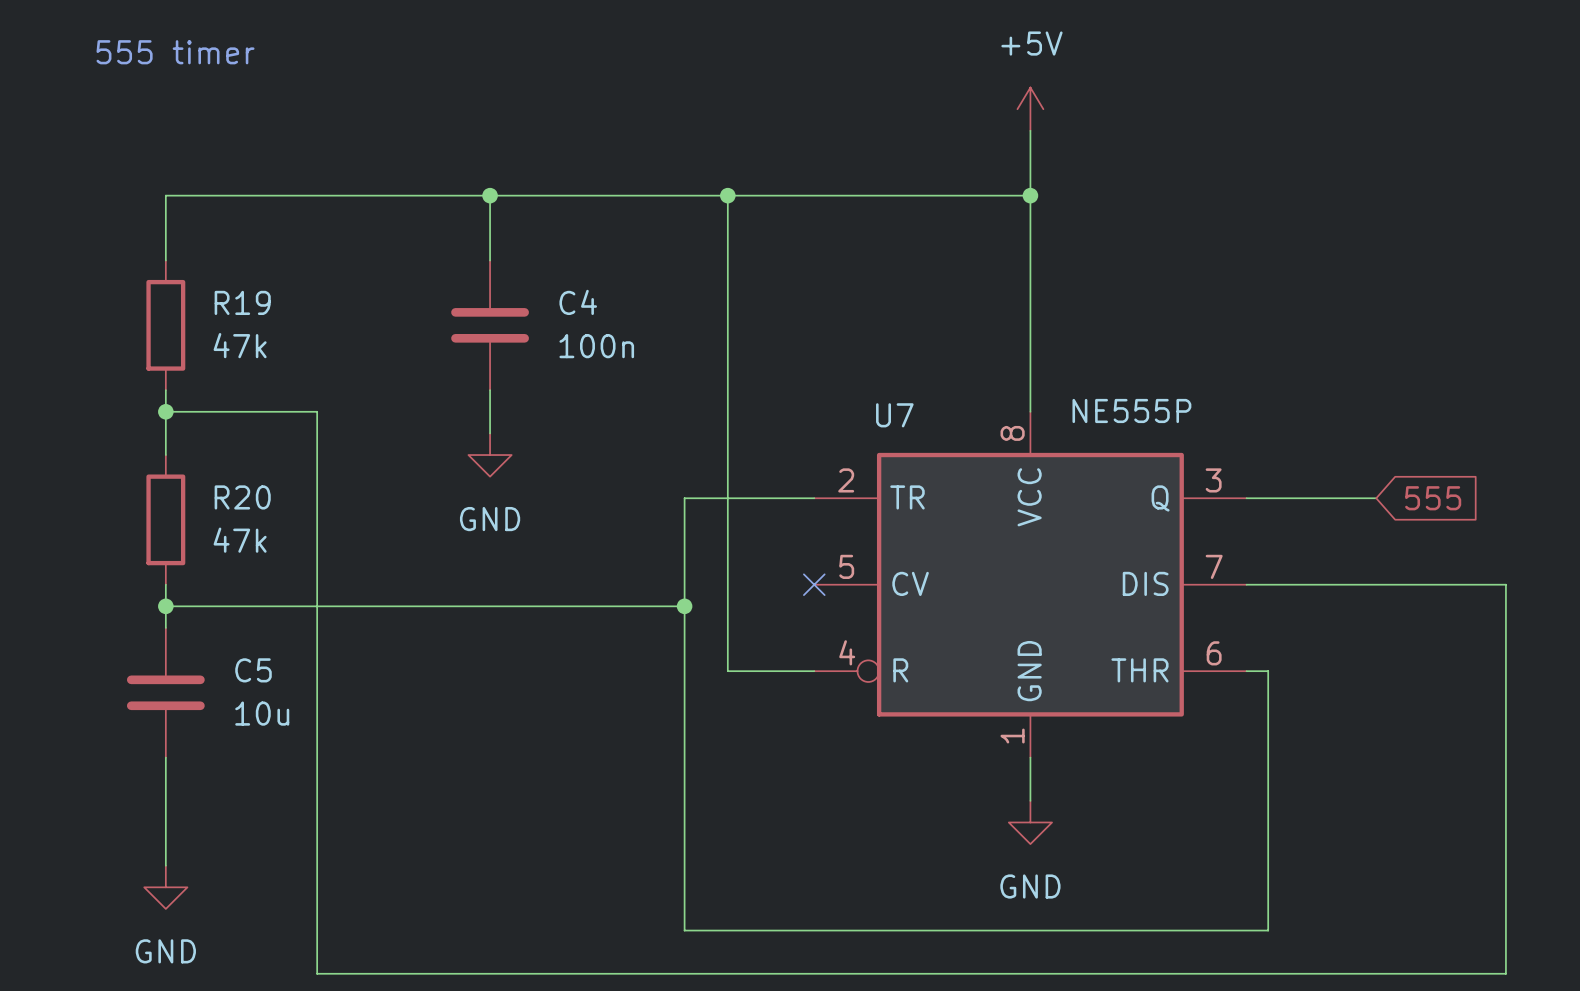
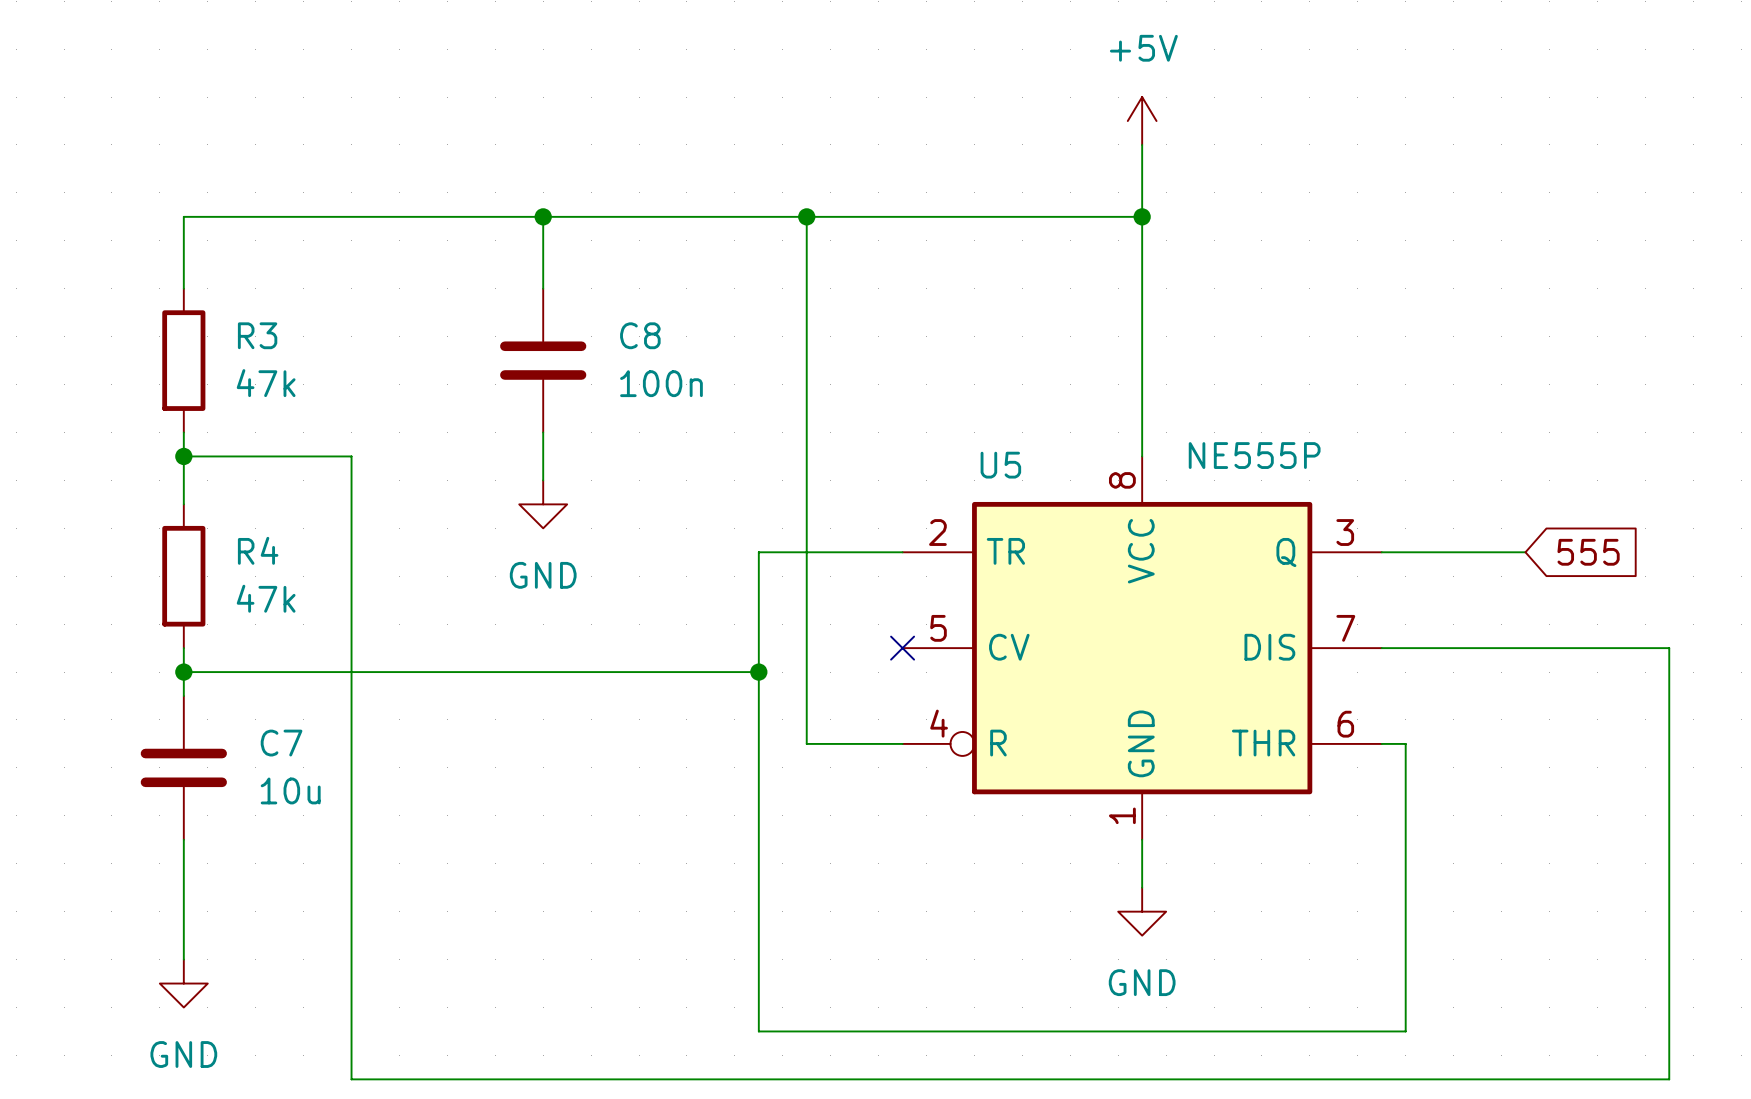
text: 555 timer (175, 52) -> none
R19 name: R19 (242, 302) -> R3 (257, 335)
C4 name: C4 (578, 302) -> C8 (640, 335)
U7 name: U7 (894, 415) -> U5 (1000, 465)
R20 name: R20 (242, 497) -> R4 (258, 550)
C5 name: C5 (253, 670) -> C7 (281, 743)

